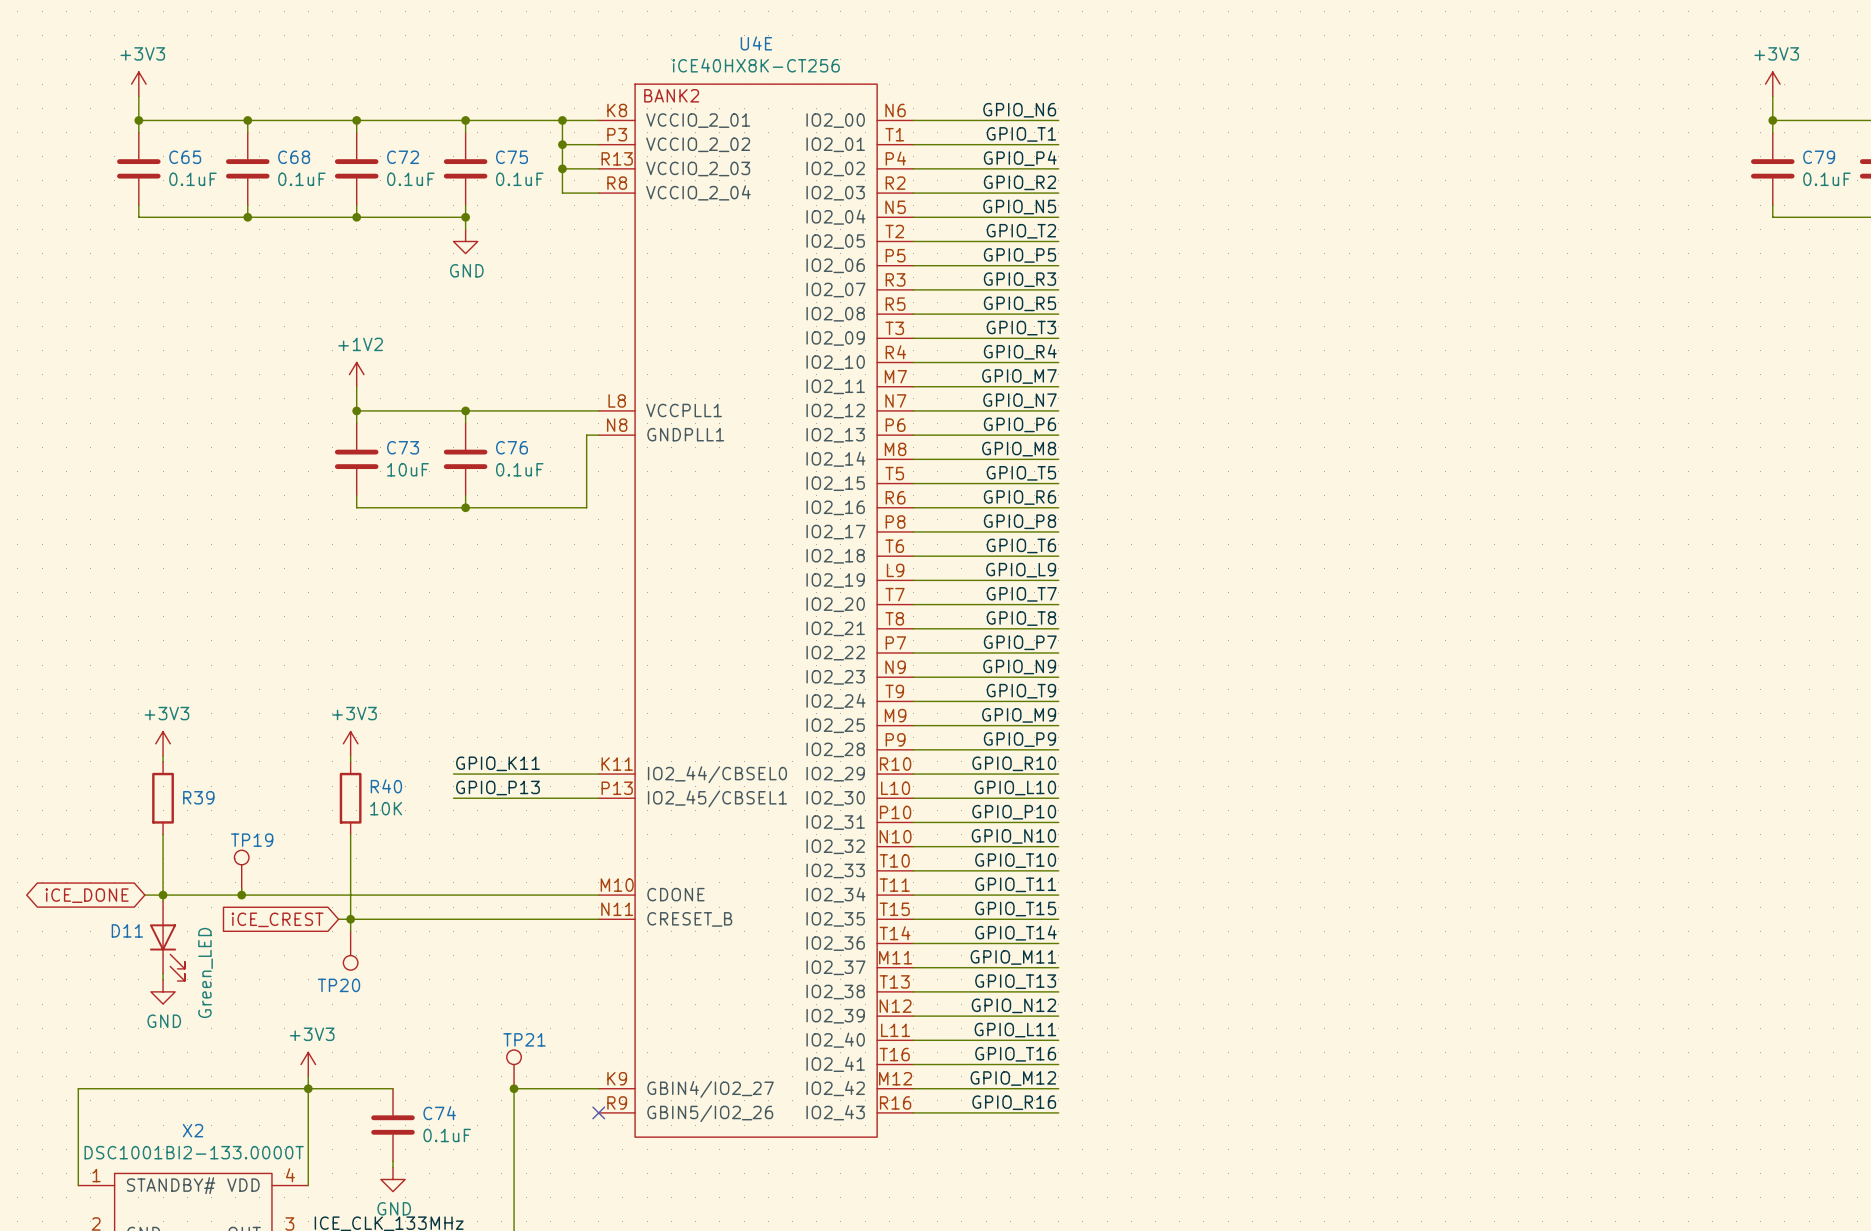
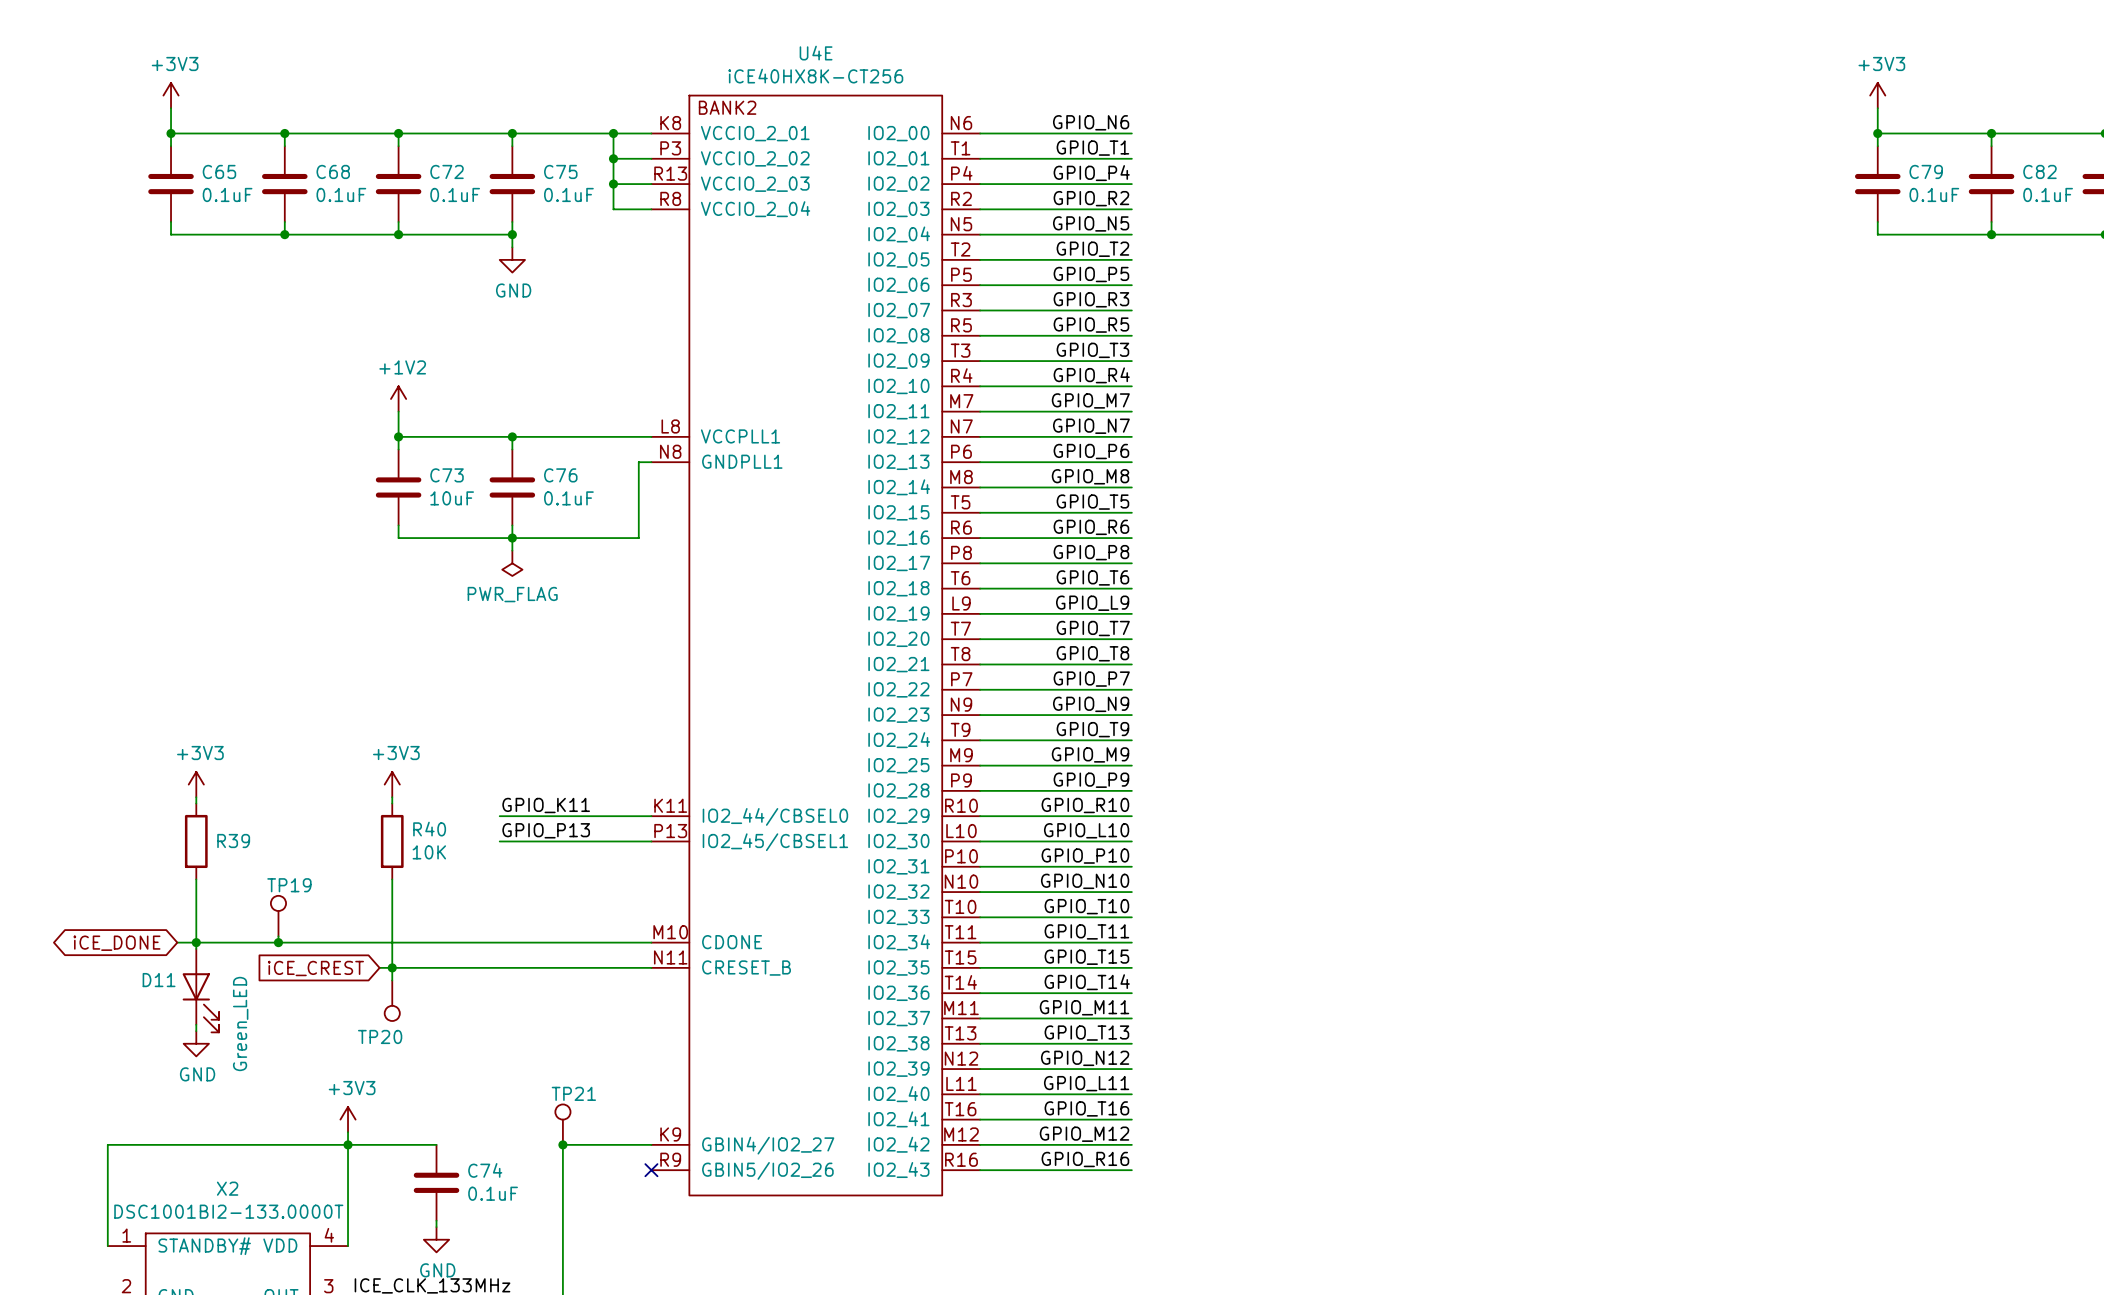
wire: none -> (512, 538) (512, 550)
power symbol: none -> PWR_FLAG (512, 563)

